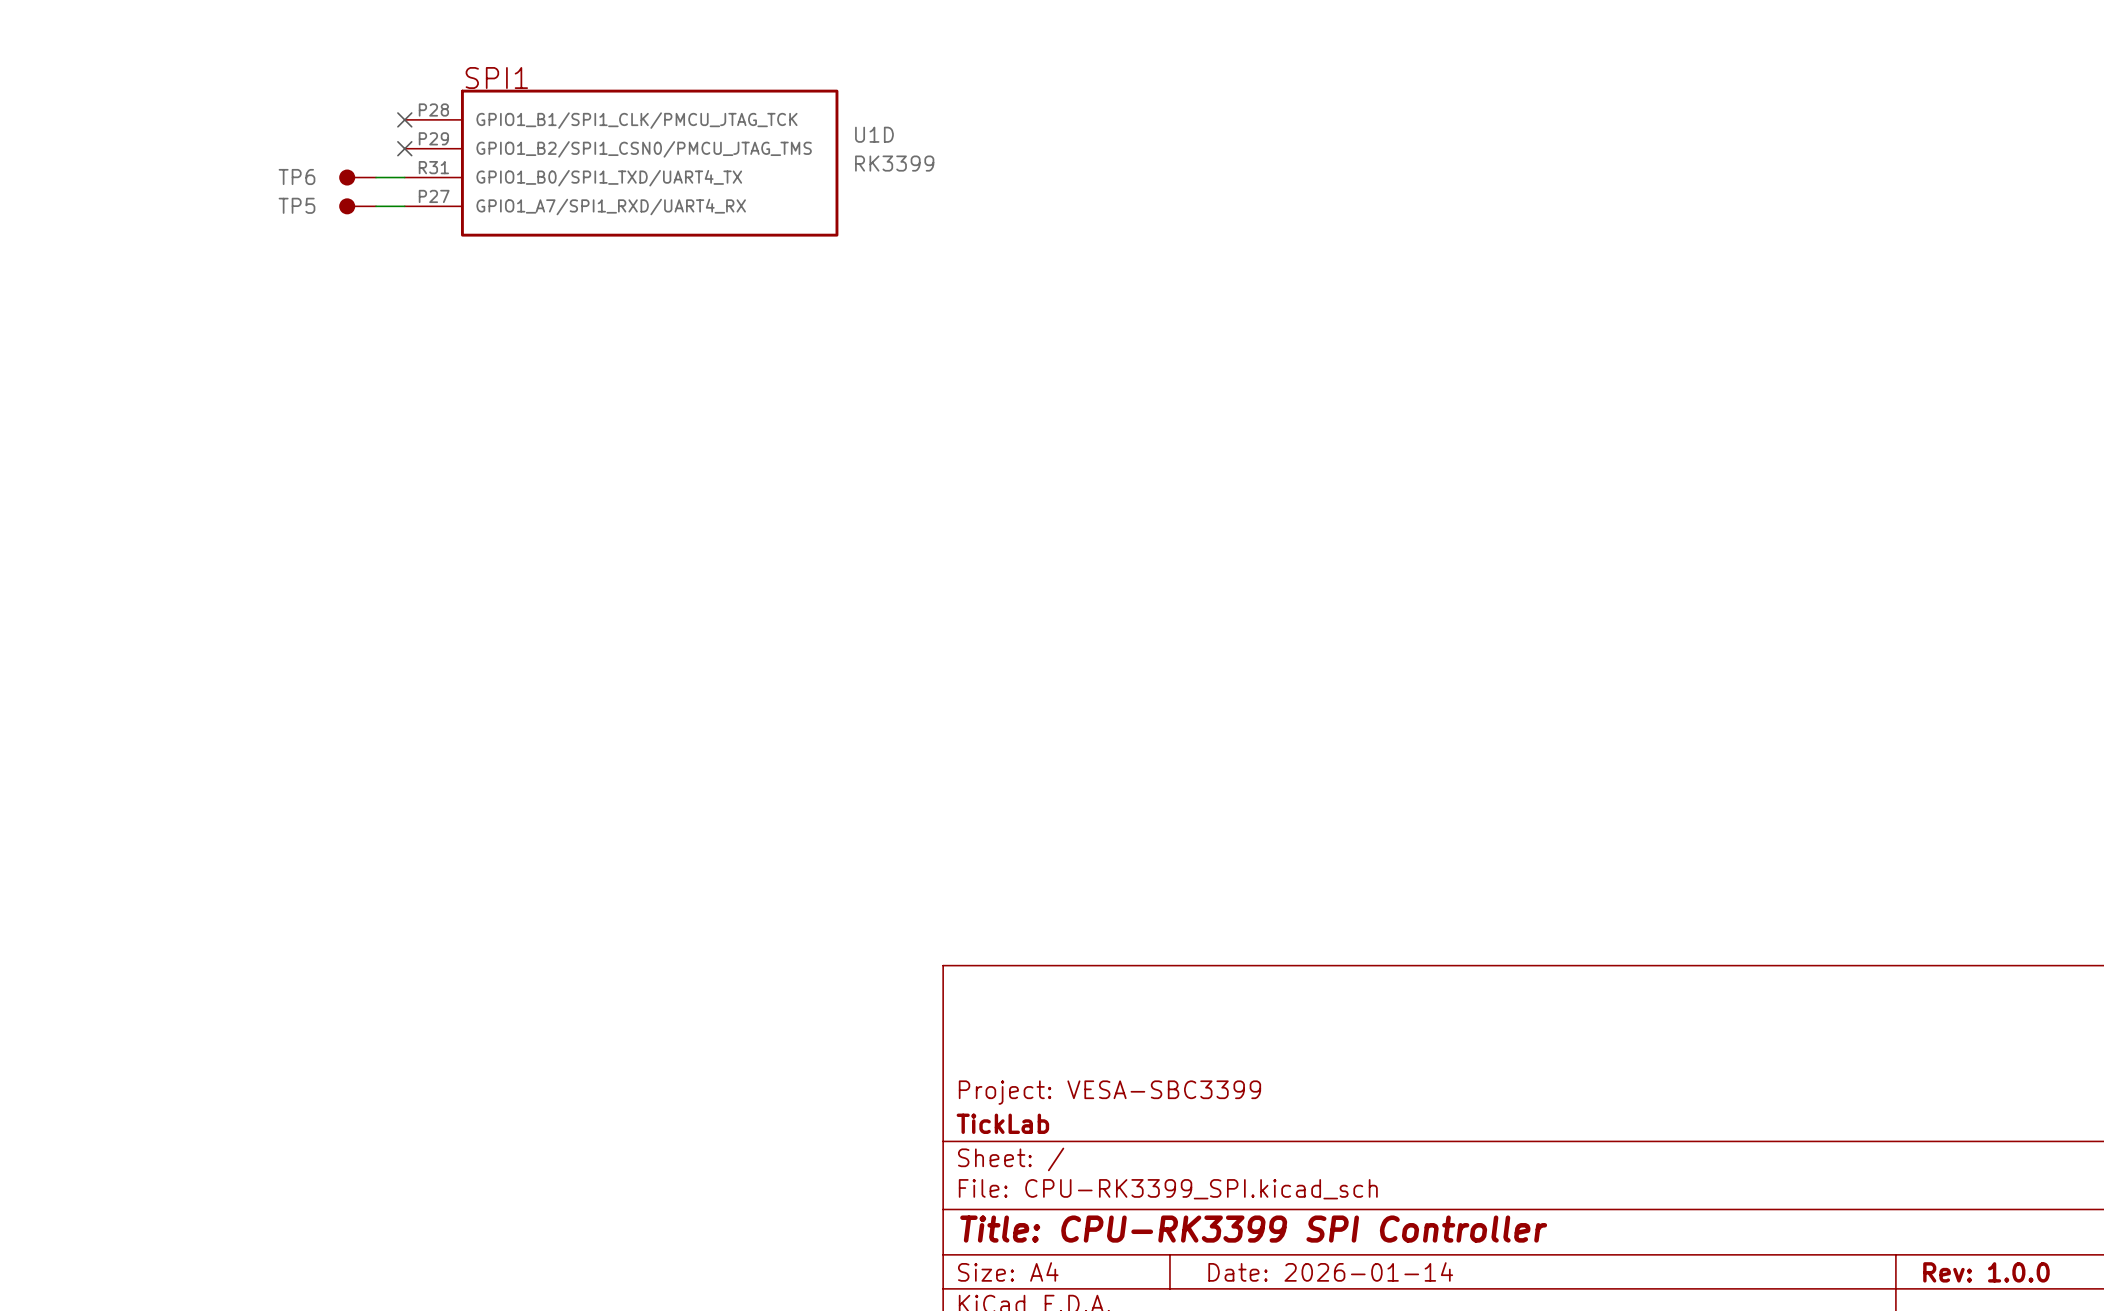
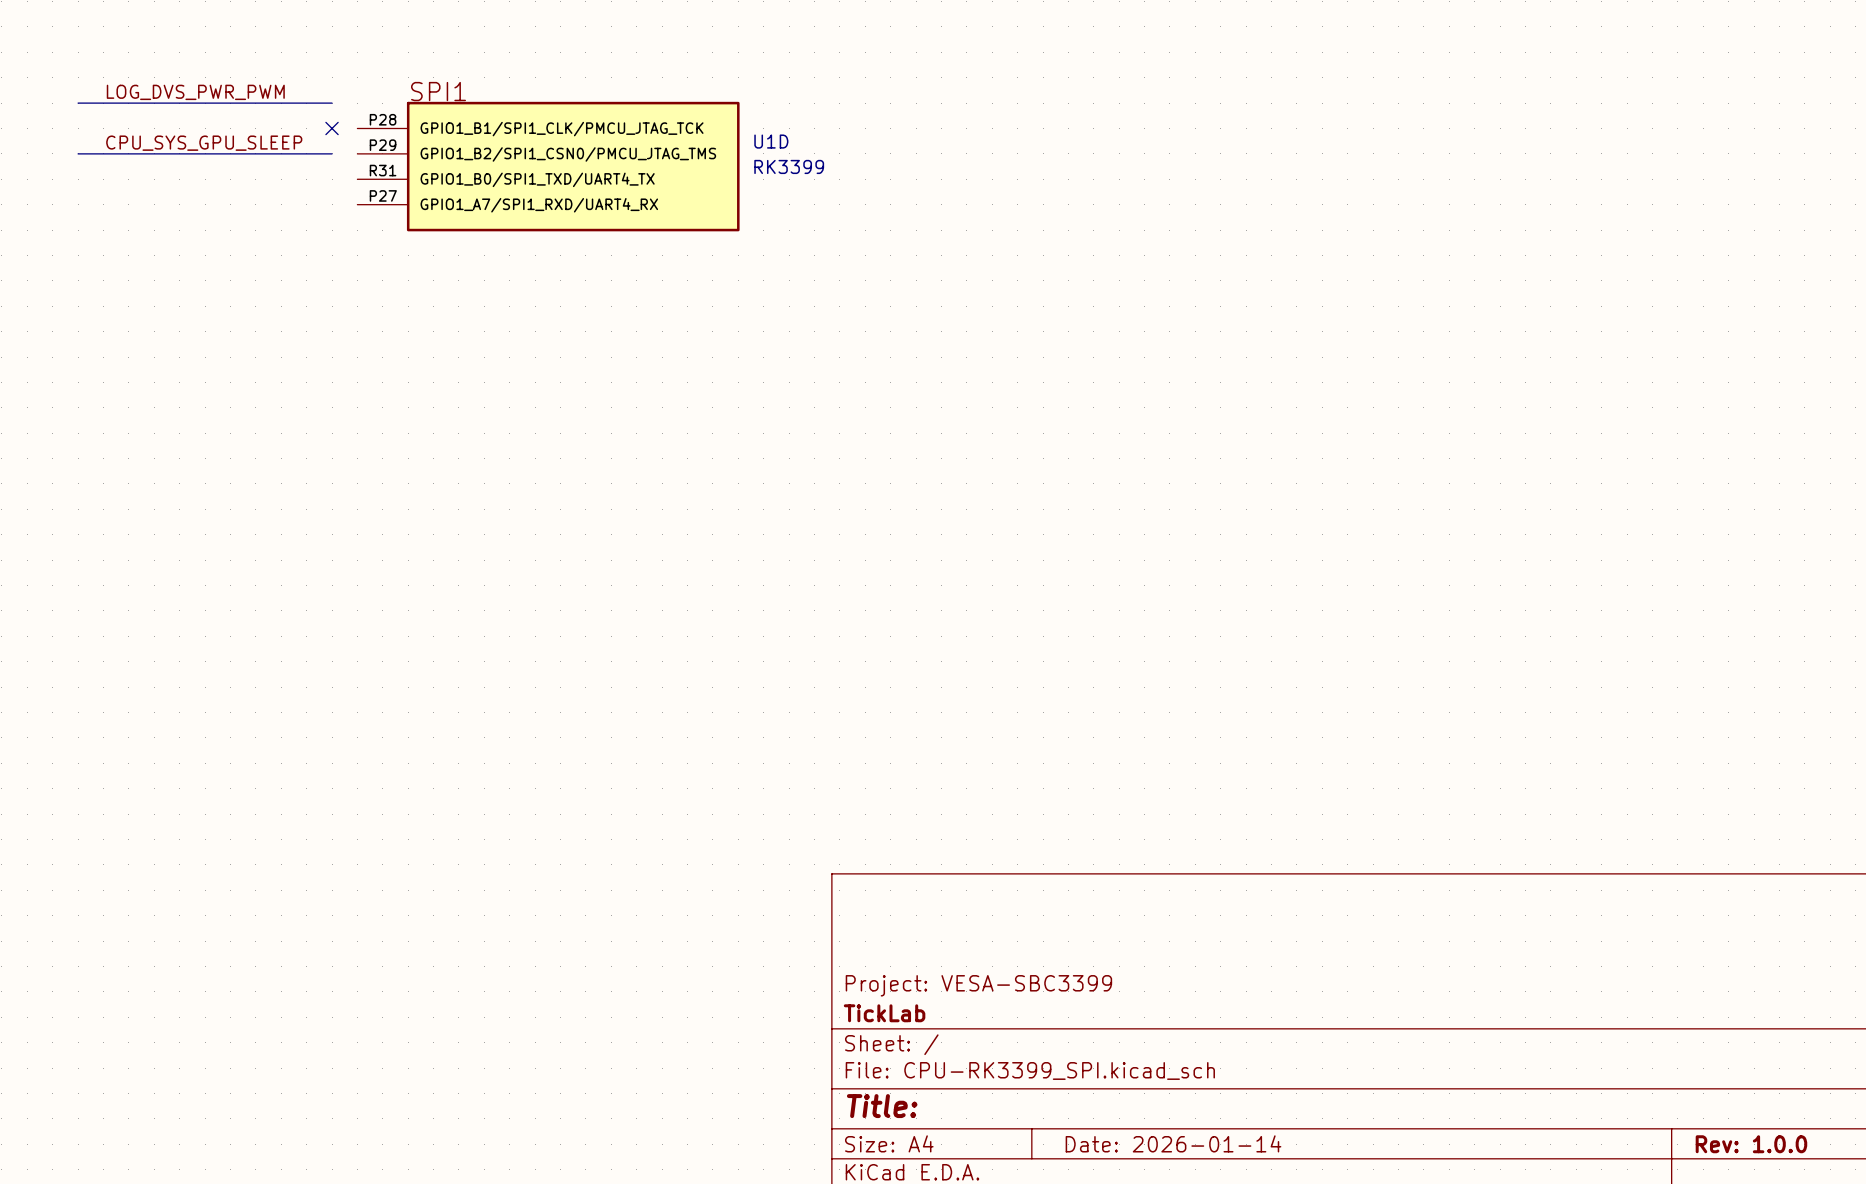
label: none -> LOG_DVS_PWR_PWM (195, 92)
wire: none -> (78, 103) (332, 103)
no-connect mark: none -> (332, 128)
no-connect mark: (404, 119) -> none
label: none -> CPU_SYS_GPU_SLEEP (204, 143)
wire: none -> (78, 153) (332, 153)
no-connect mark: (404, 148) -> none
TP6: (357, 177) -> none
wire: (376, 177) (404, 177) -> none
TP5: (357, 206) -> none
wire: (376, 206) (404, 206) -> none
title block: Title: CPU-RK3399 SPI Controller (1253, 1229) -> Title: (882, 1106)

